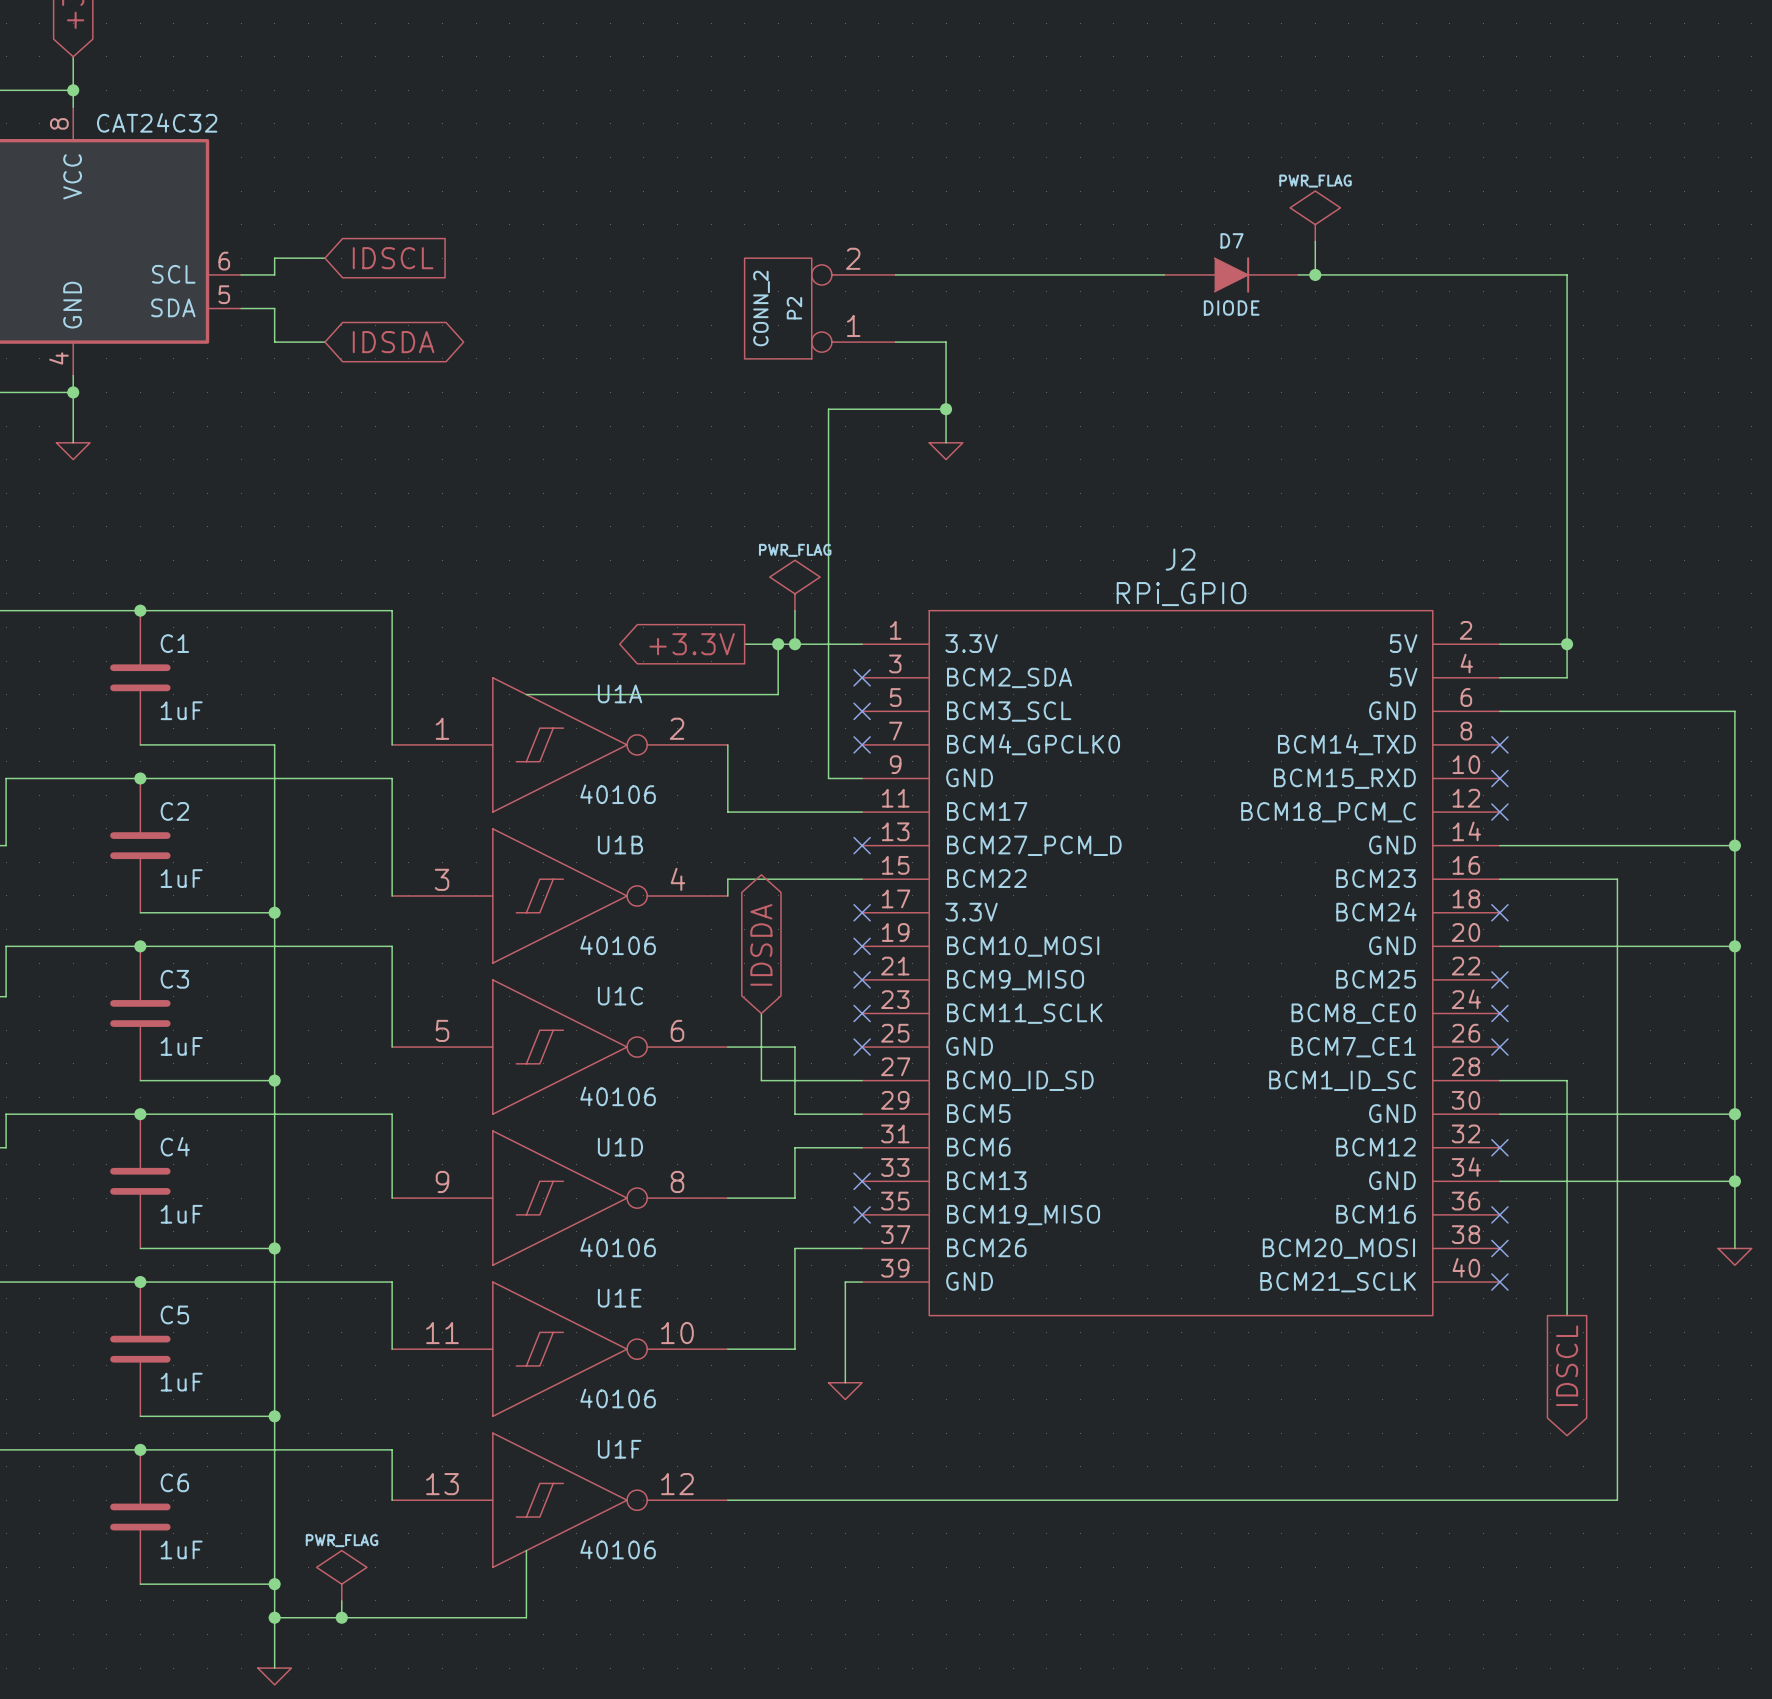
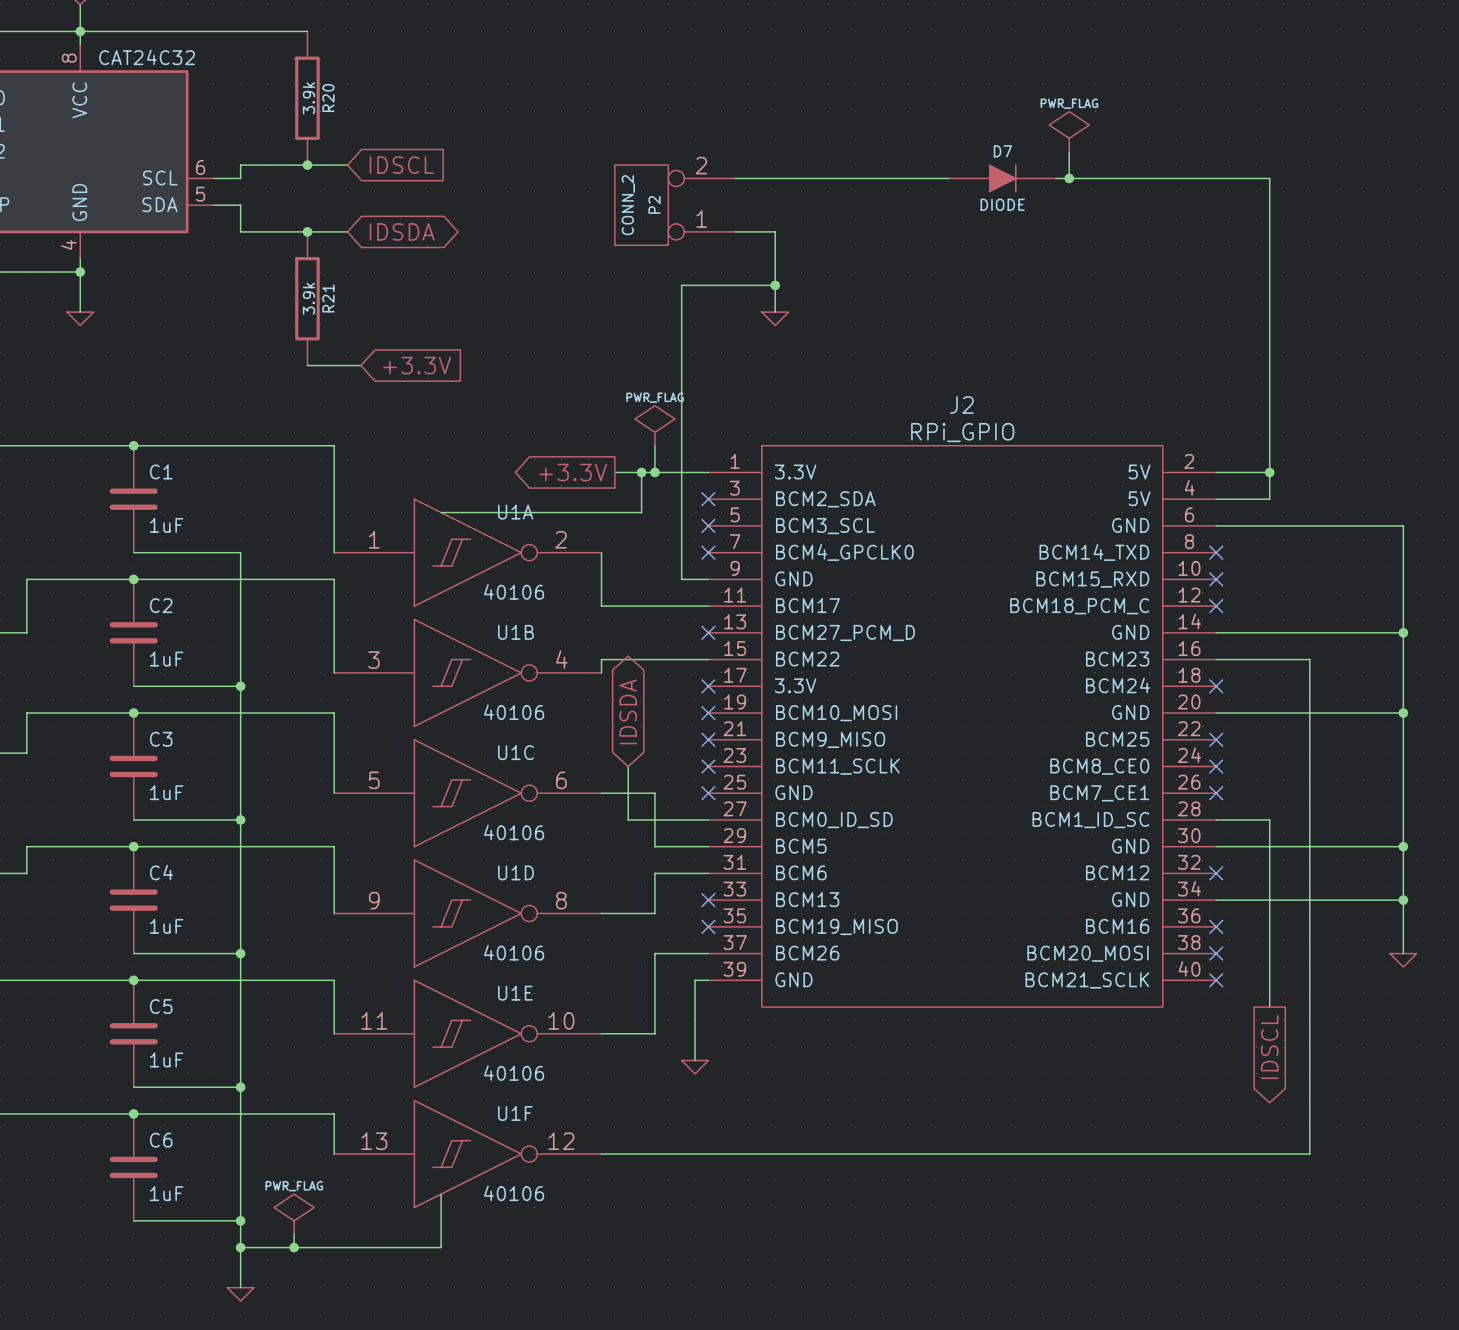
wire: none -> (80, 31) (307, 31)
R20: none -> 3.9k (307, 98)
wire: none -> (280, 165) (347, 165)
junction: none -> (307, 165)
global label position: IDSCL (393, 258) -> IDSCL (401, 165)
wire: none -> (280, 231) (347, 231)
junction: none -> (307, 231)
global label position: IDSDA (393, 342) -> IDSDA (402, 231)
R21: none -> 3.9k (307, 298)
wire: none -> (307, 365) (360, 365)
global label: none -> +3.3V (417, 365)

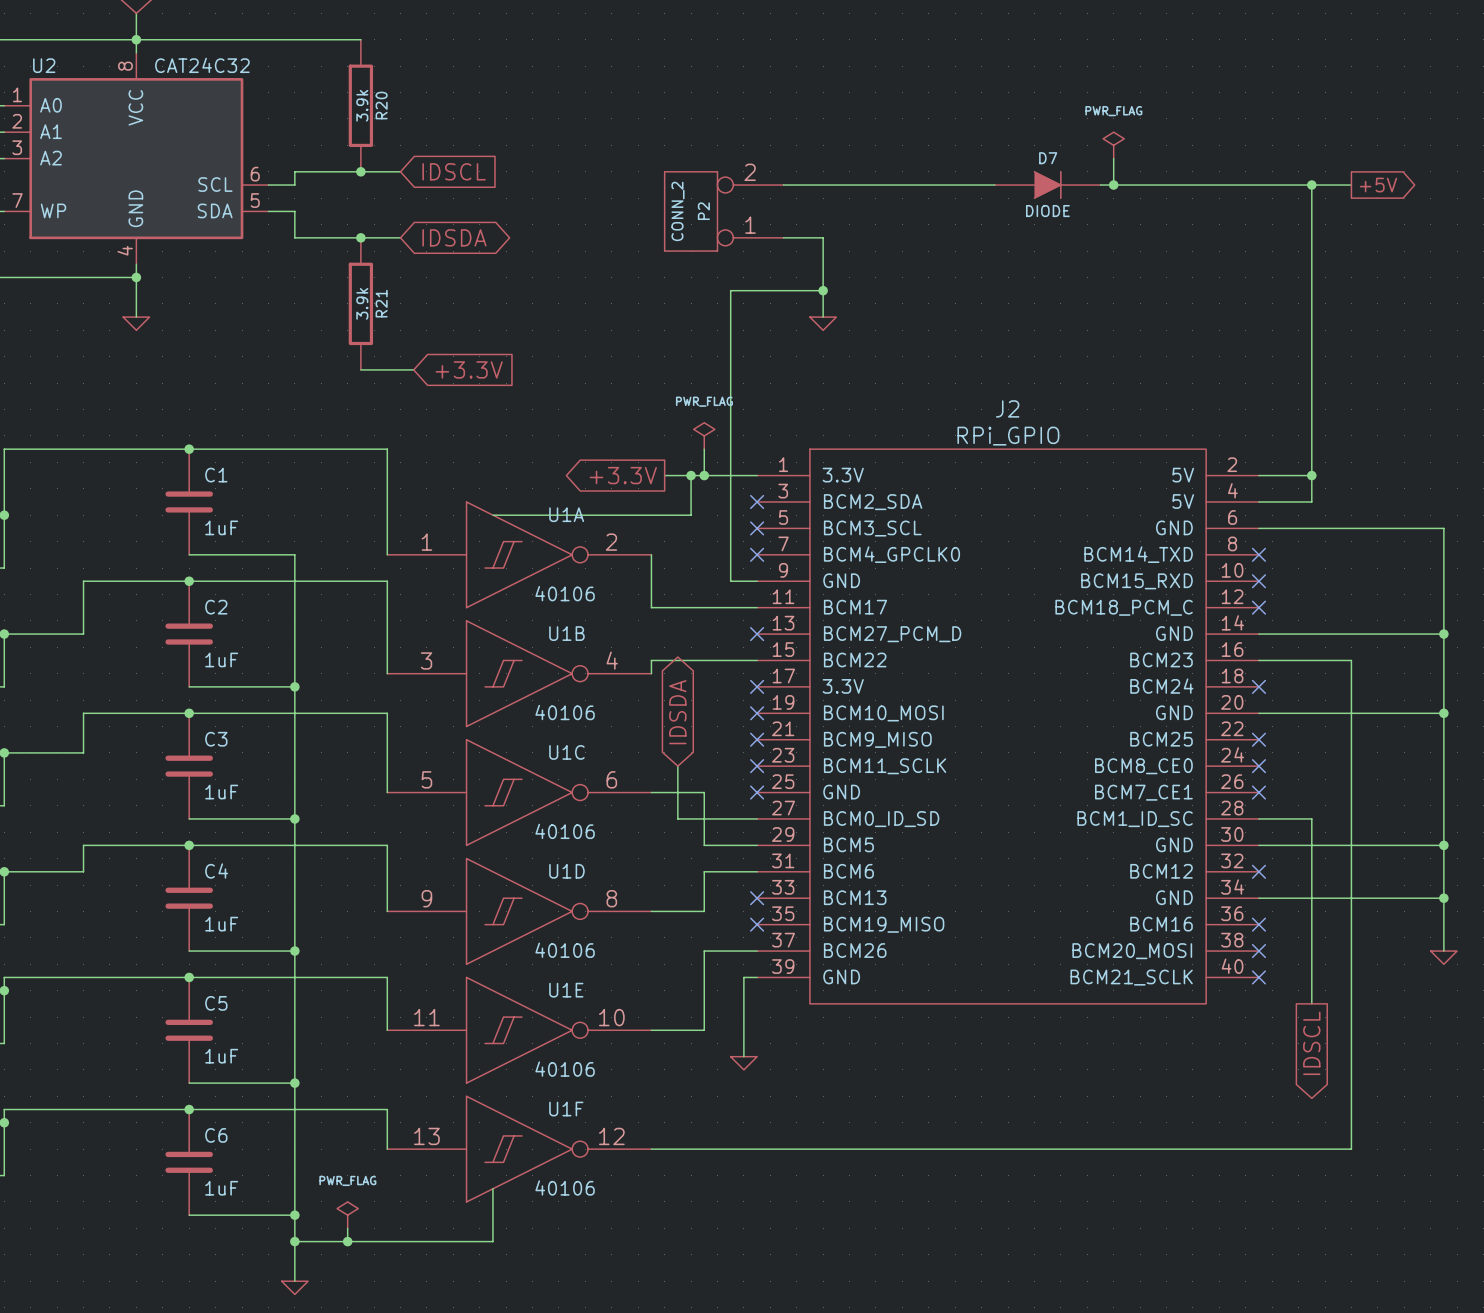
power symbol shape: [1049, 111, 1090, 152] -> [1103, 132, 1125, 159]
wire: none -> (1311, 185) (1351, 185)
junction: none -> (1311, 185)
global label: none -> +5V (1378, 185)
power symbol shape: [634, 405, 675, 446] -> [693, 422, 715, 450]
power symbol shape: [274, 1194, 315, 1235] -> [337, 1201, 359, 1229]

